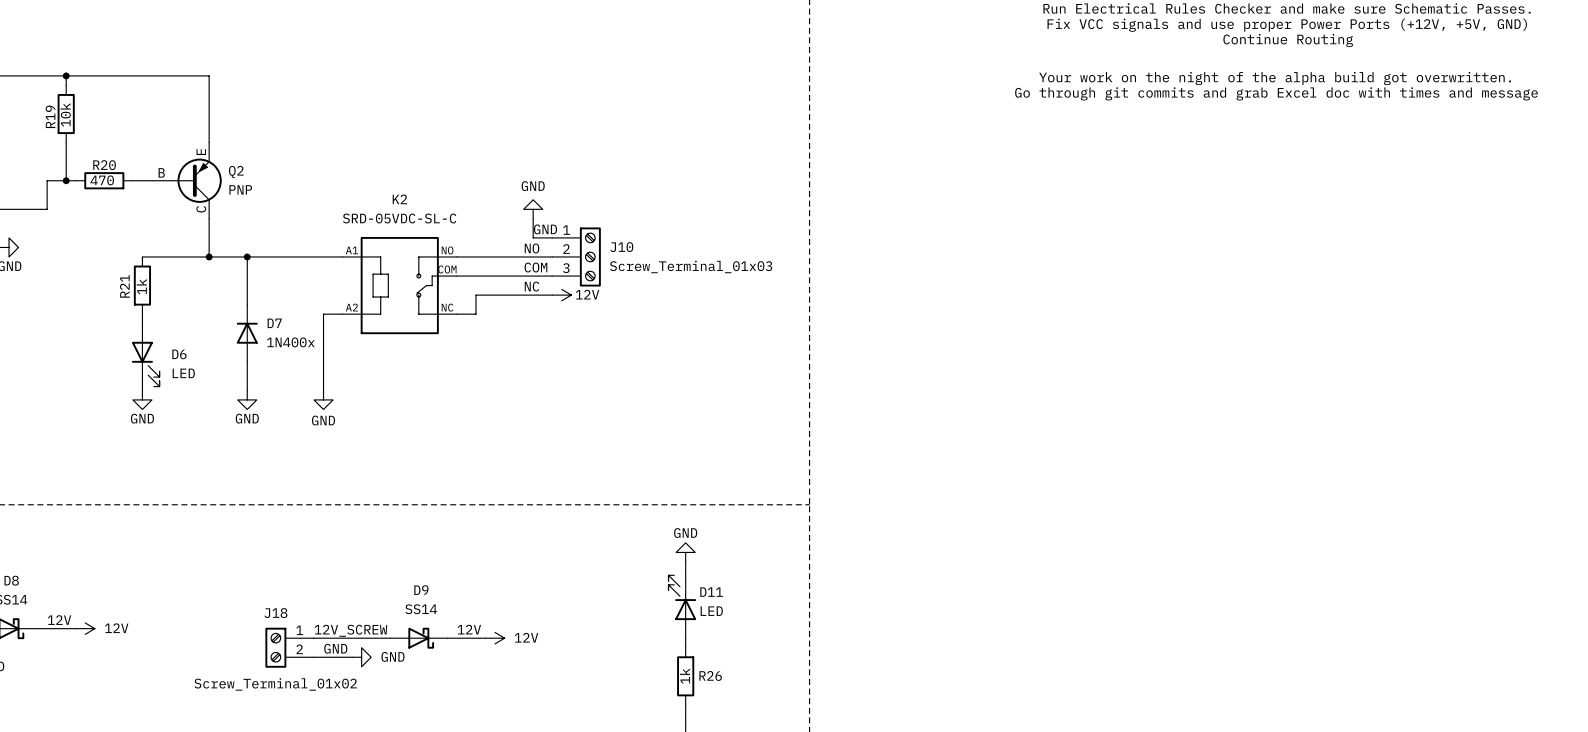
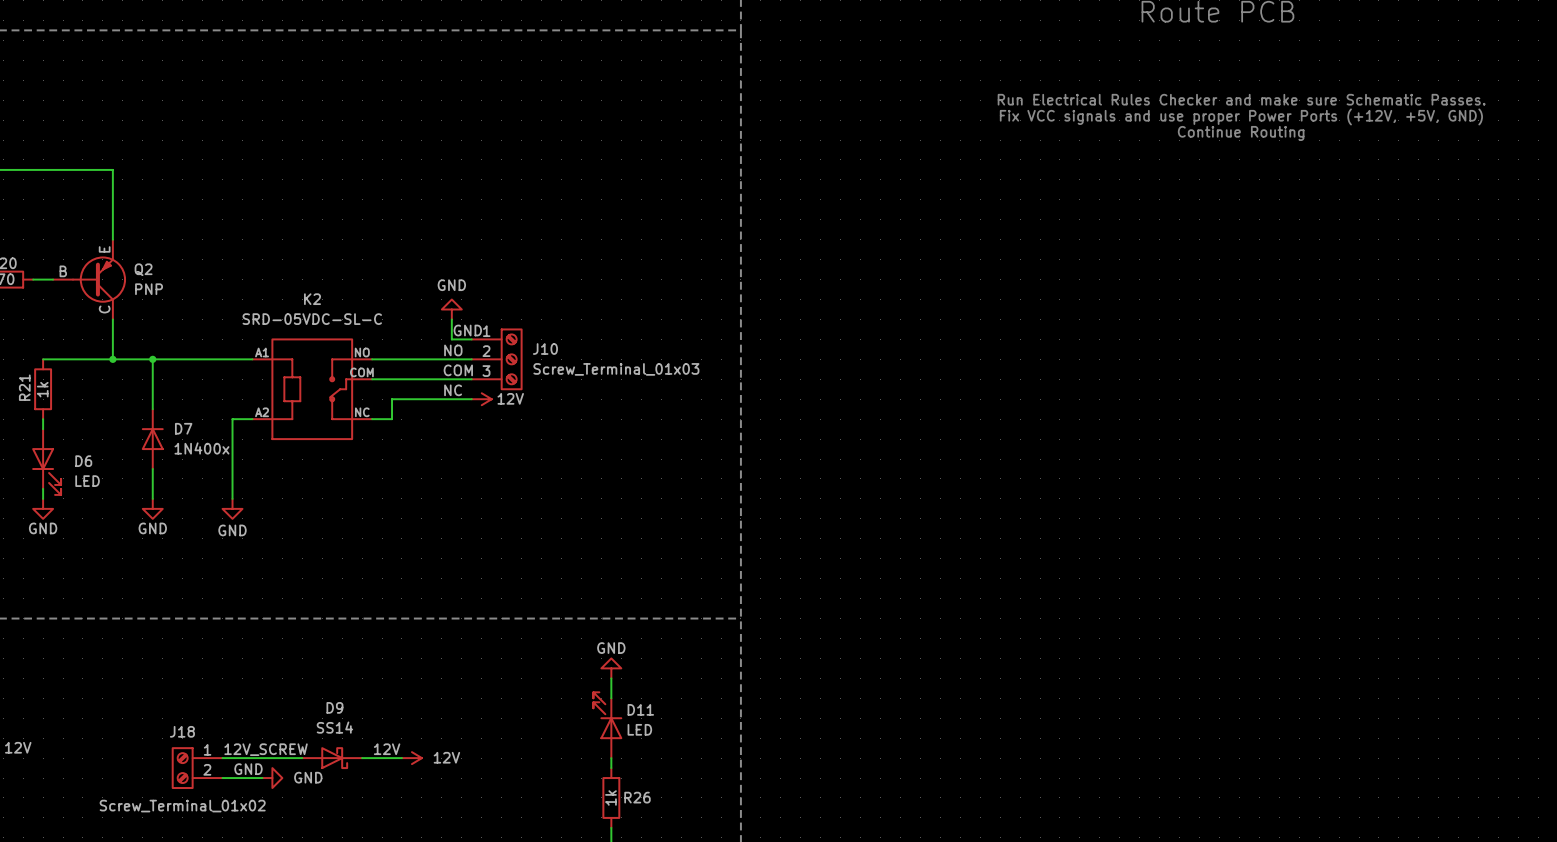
text: Your work on the night of the alpha build got overwritten. (1275, 78) -> none
text: Go through git commits and grab Excel doc with times and message (1276, 93) -> none

